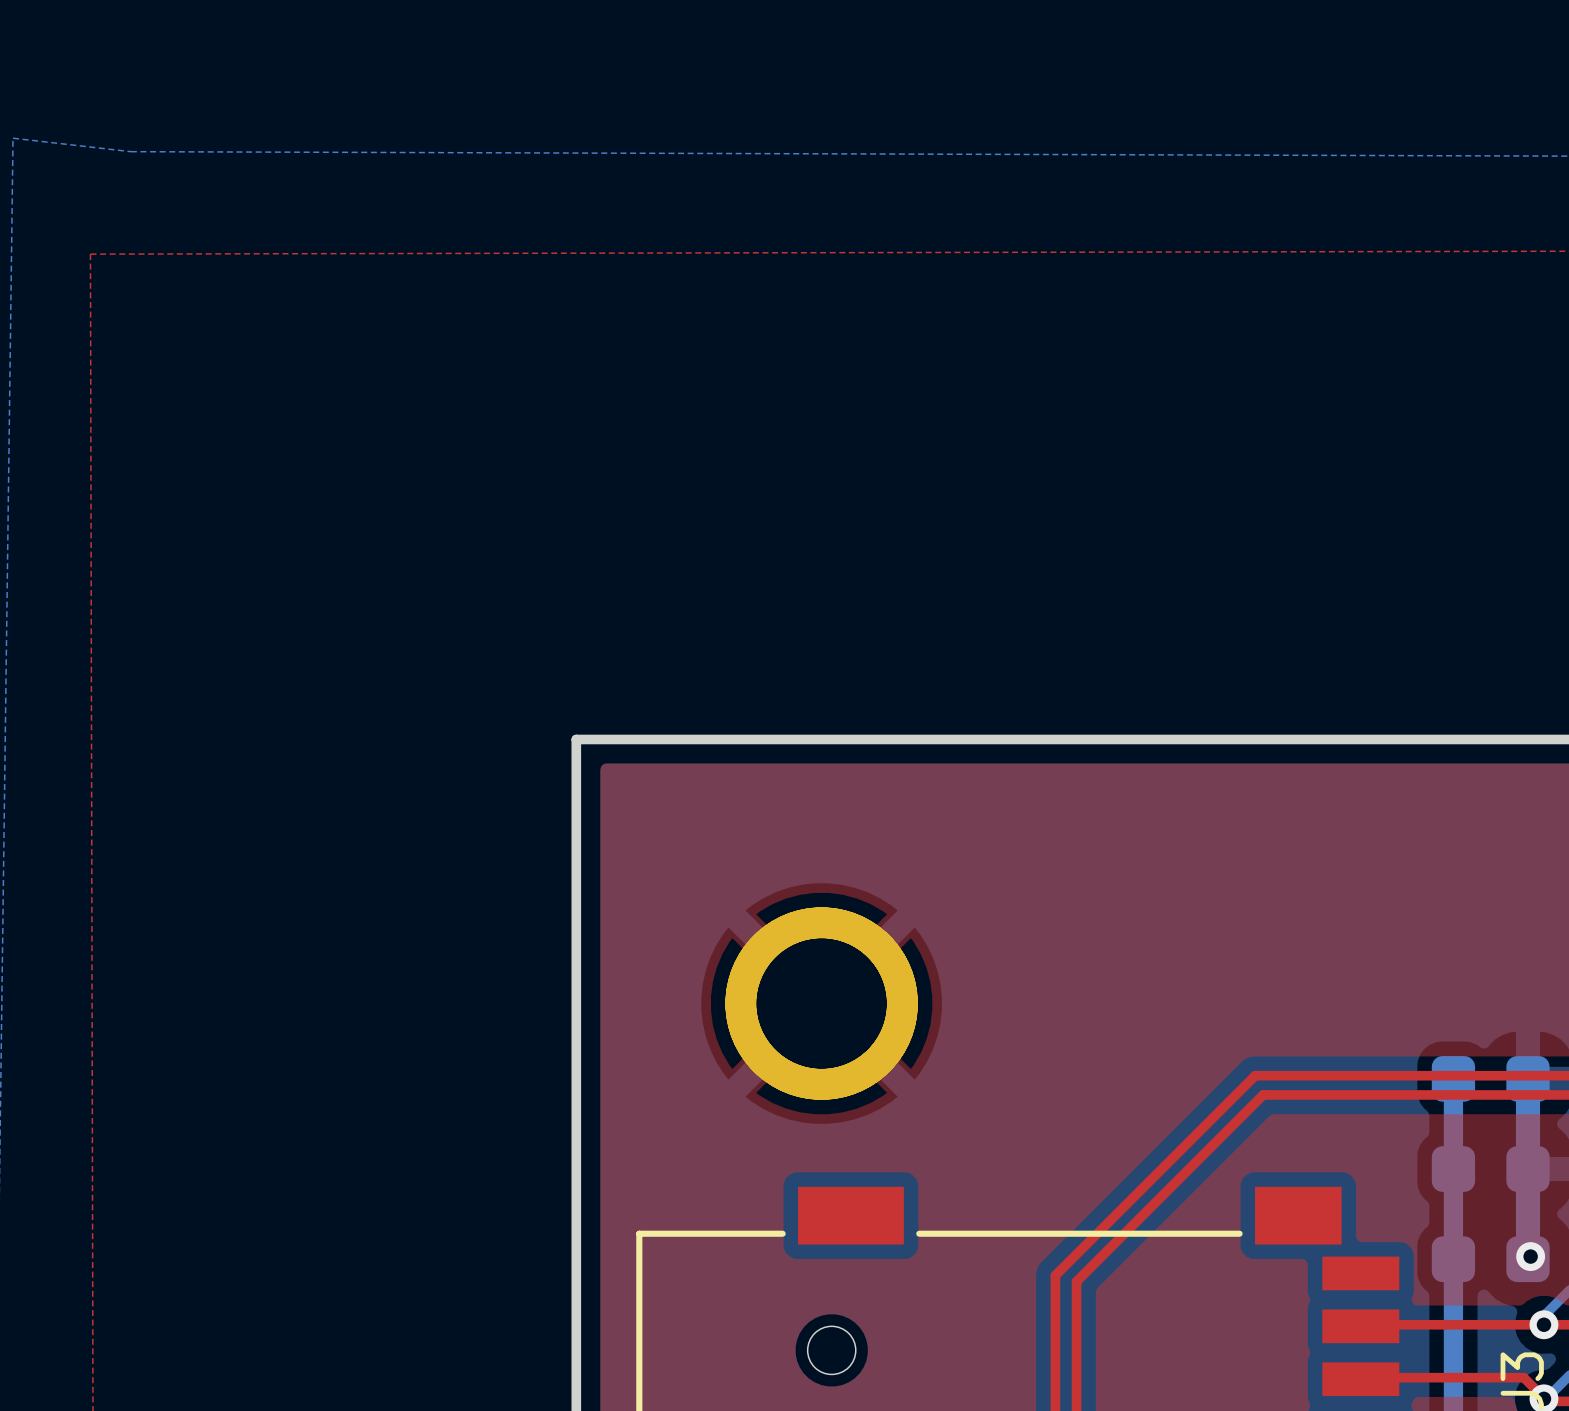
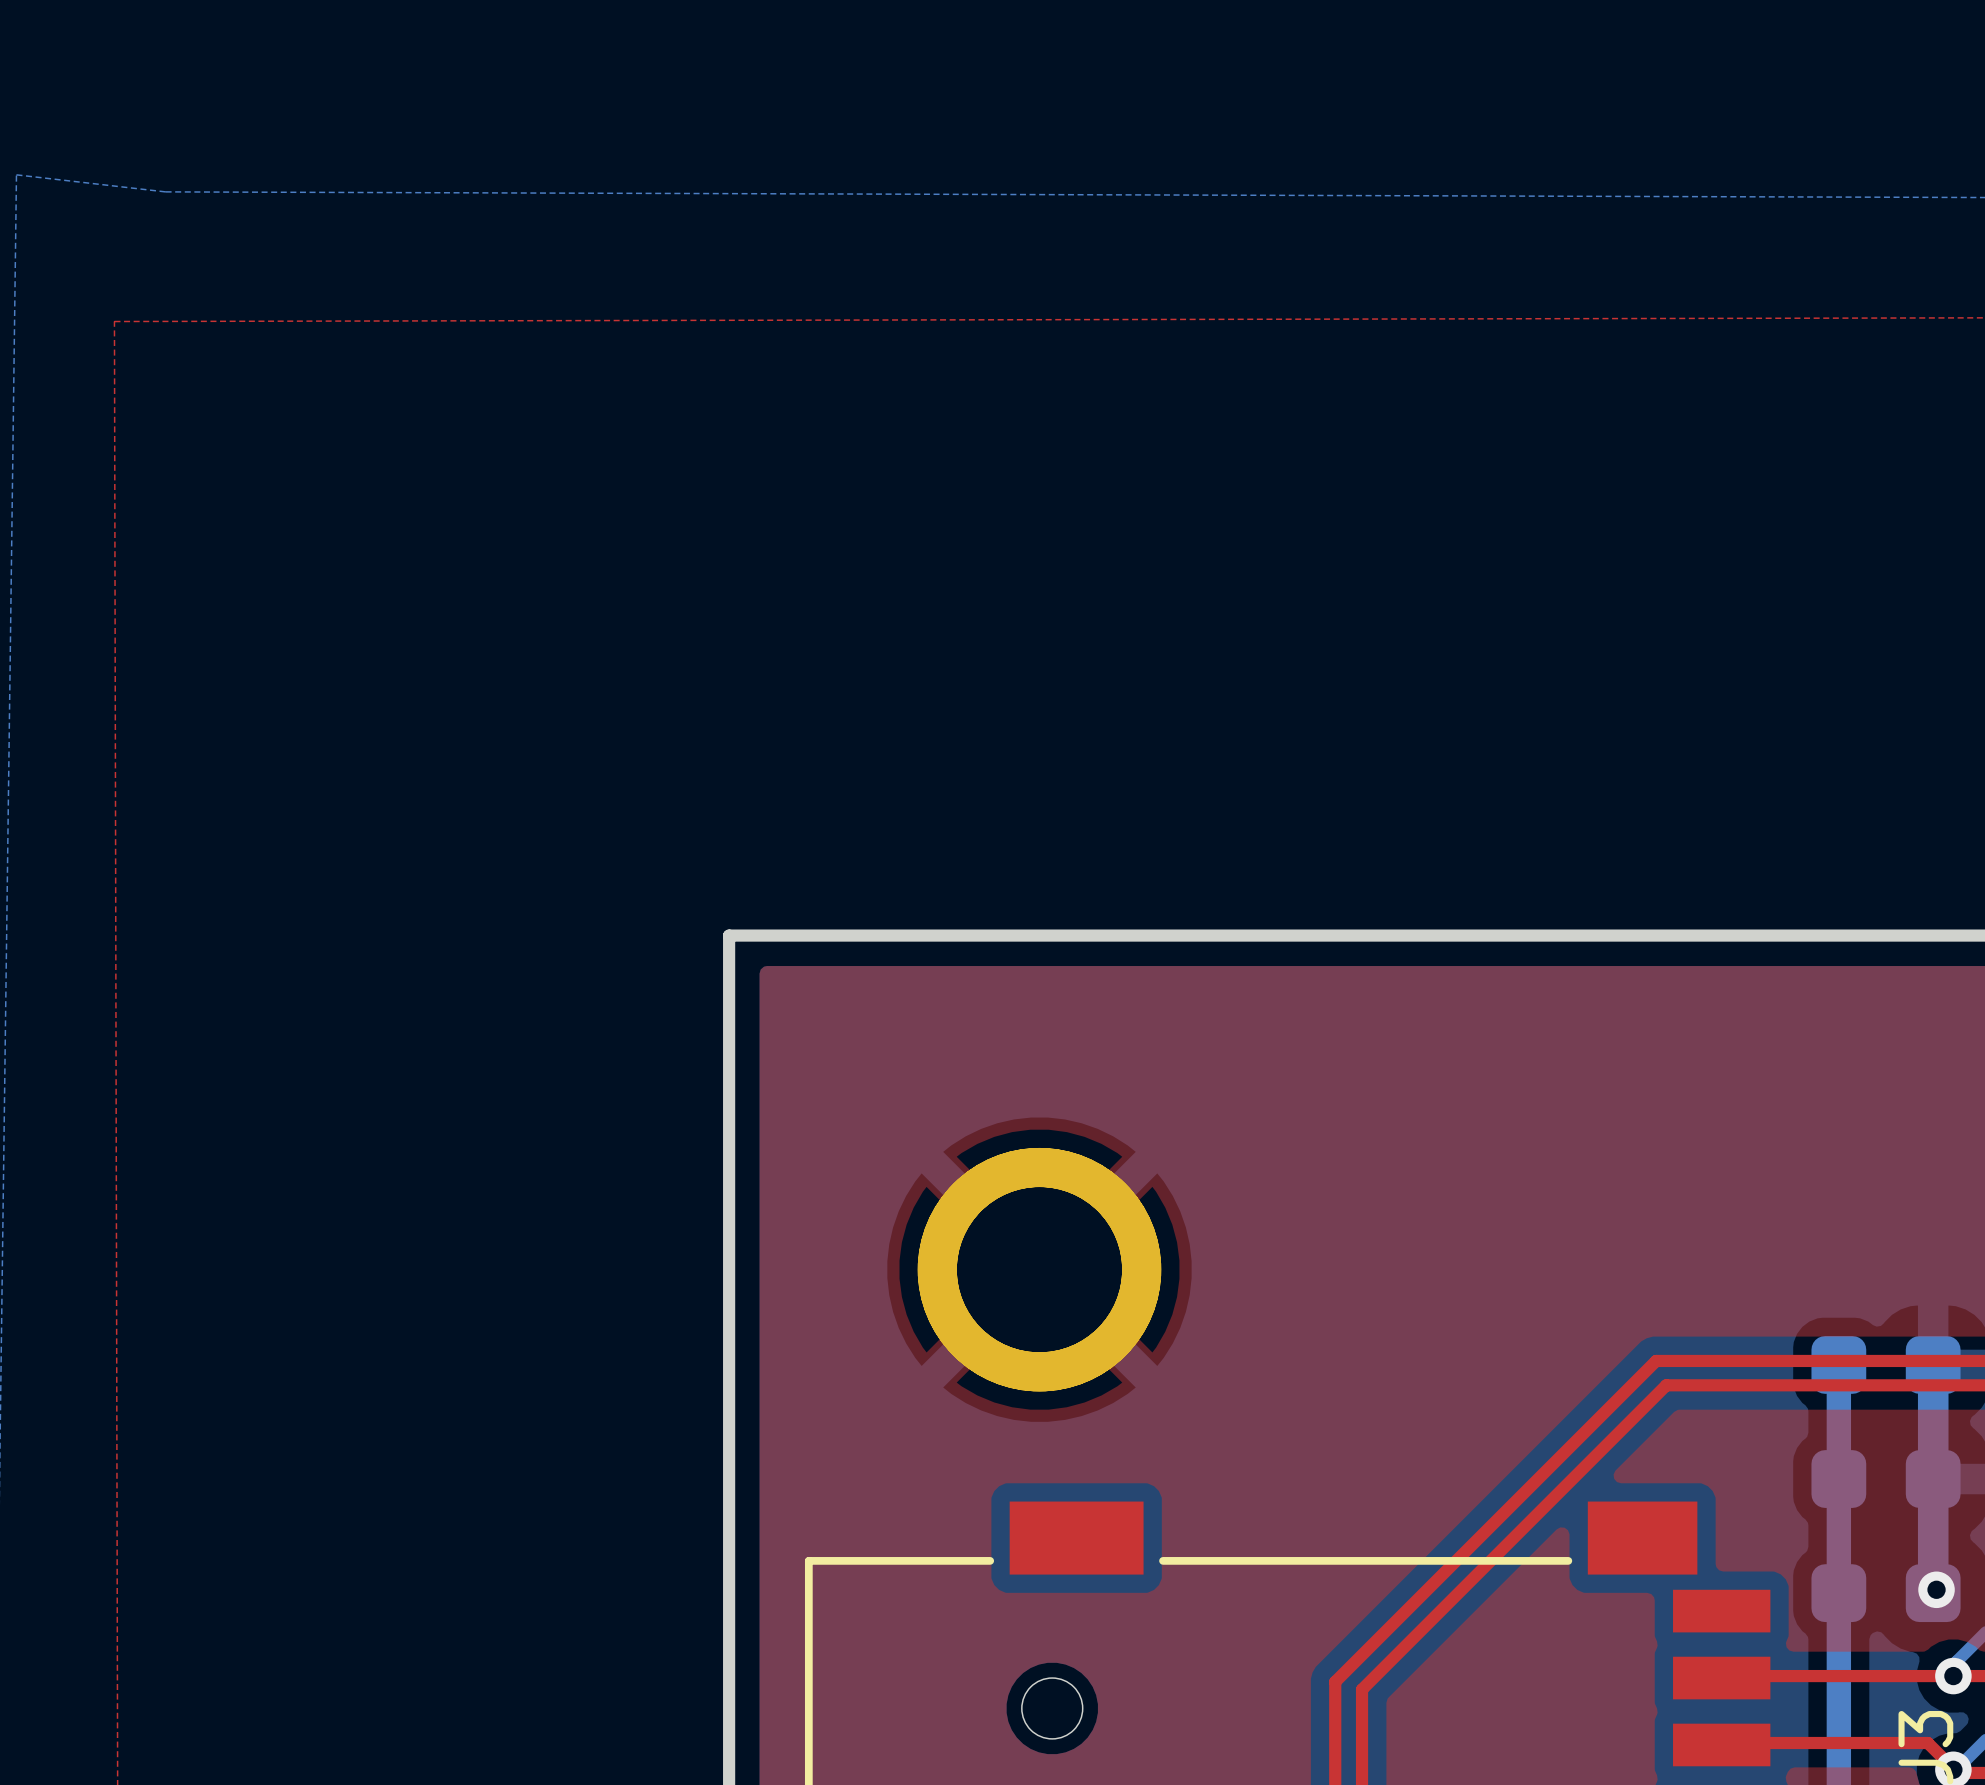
top track: (1309, 1075) (1255, 1075) (1055, 1275) (1055, 1329) -> (1656, 1360) (1335, 1681)
top track: (1317, 1094) (1263, 1094) (1076, 1281) (1076, 1335) -> (1666, 1385) (1362, 1689)

